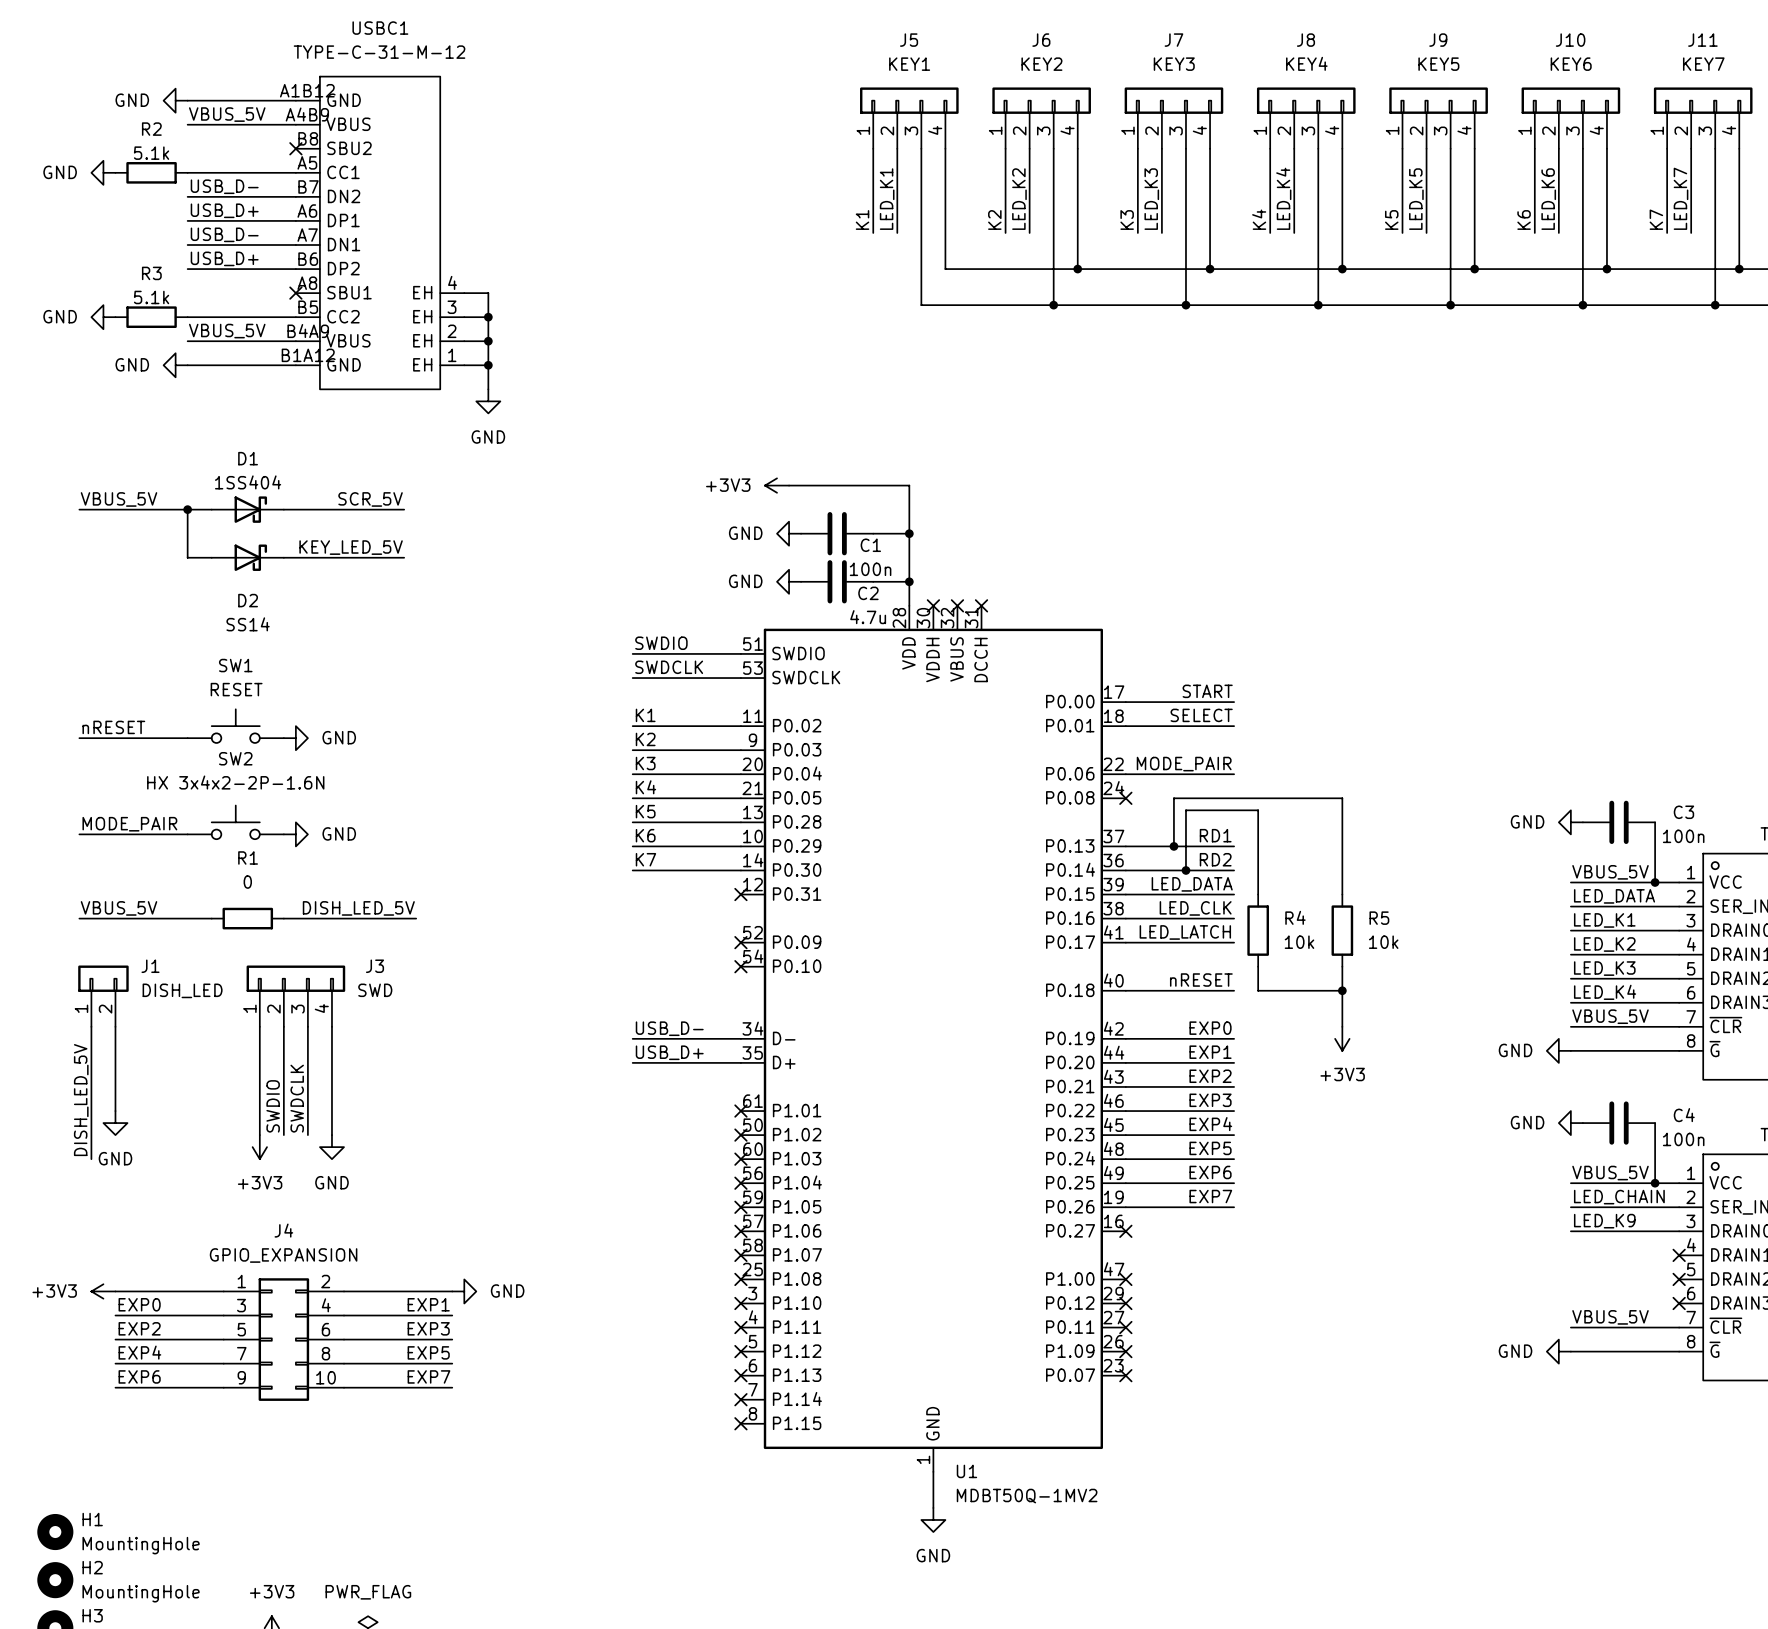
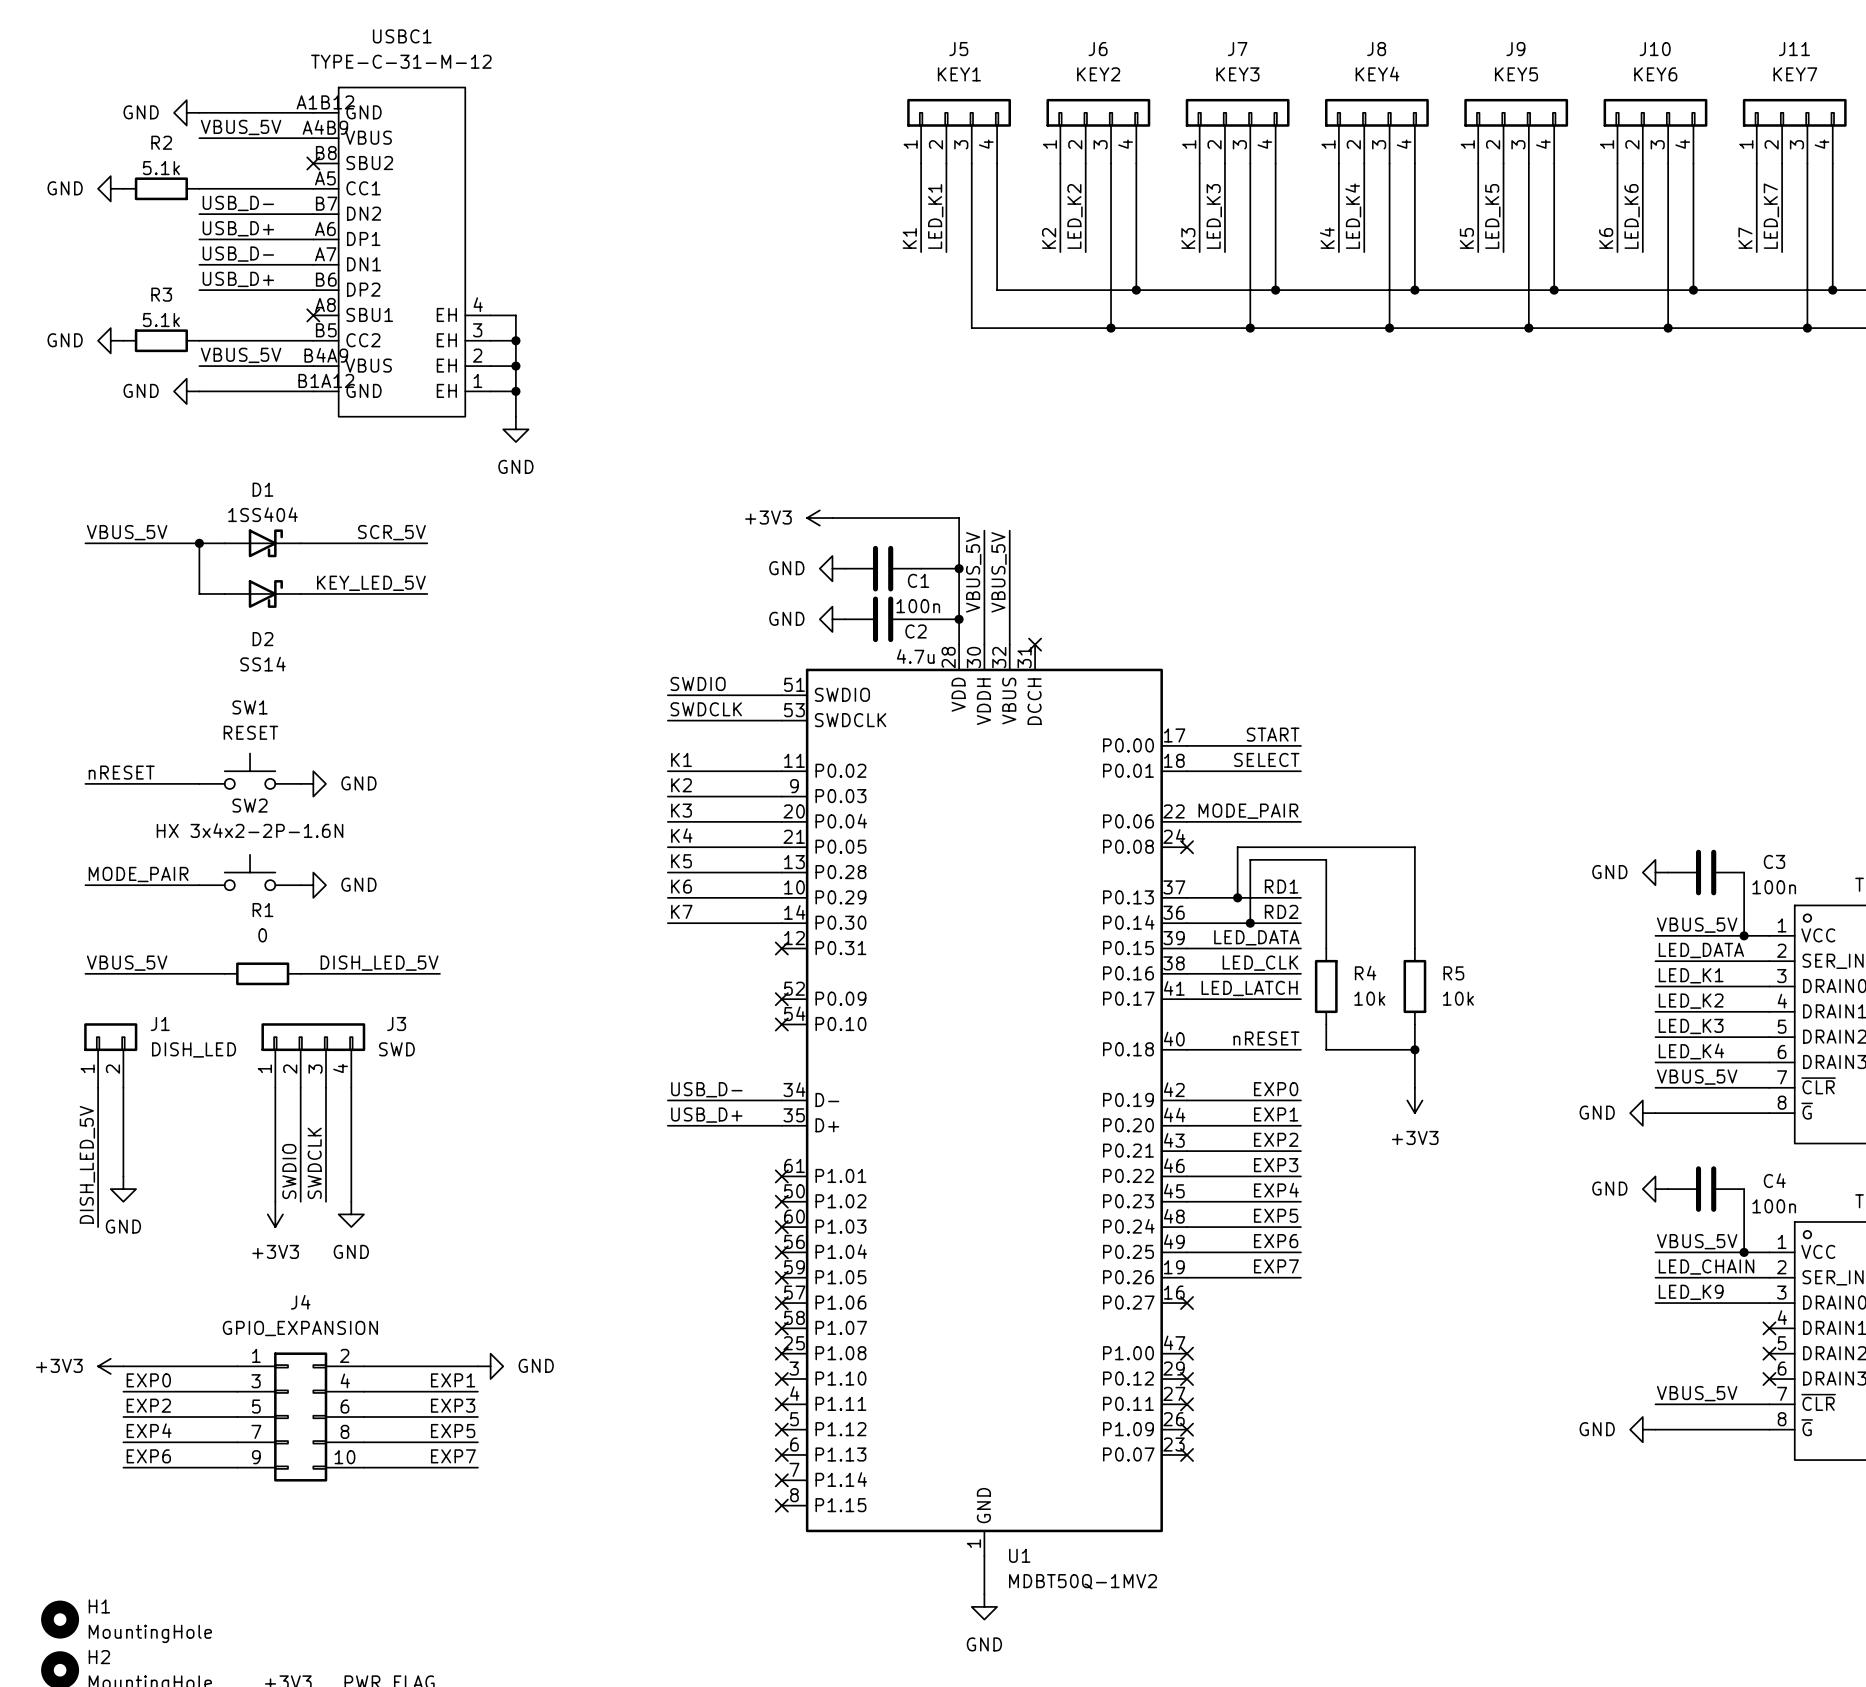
wire: none -> (984, 530) (984, 644)
wire: none -> (1009, 530) (1009, 644)
label: none -> VBUS_5V (973, 572)
label: none -> VBUS_5V (999, 572)
no-connect mark: (933, 605) -> none
no-connect mark: (957, 605) -> none

